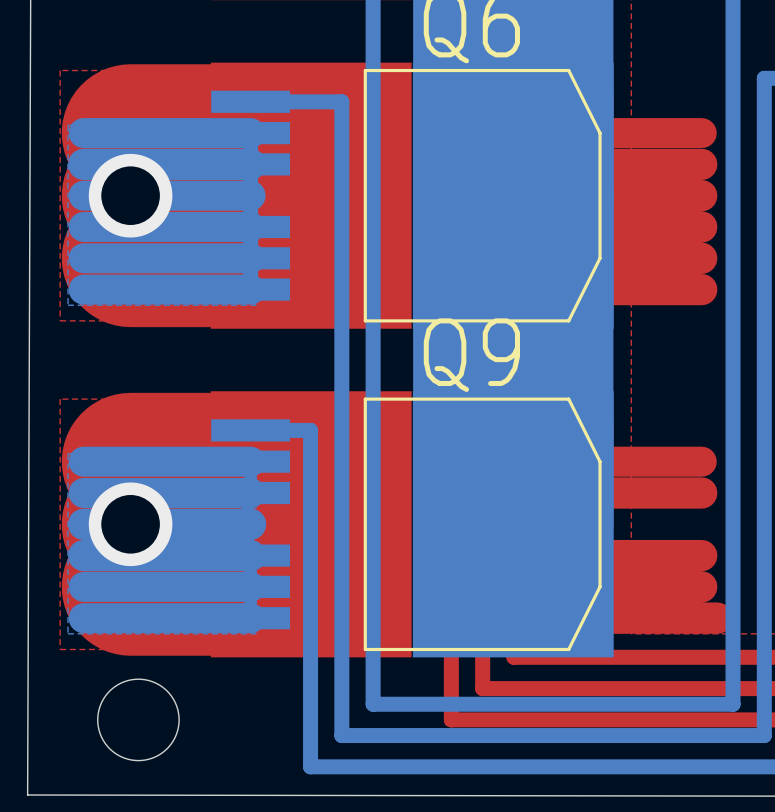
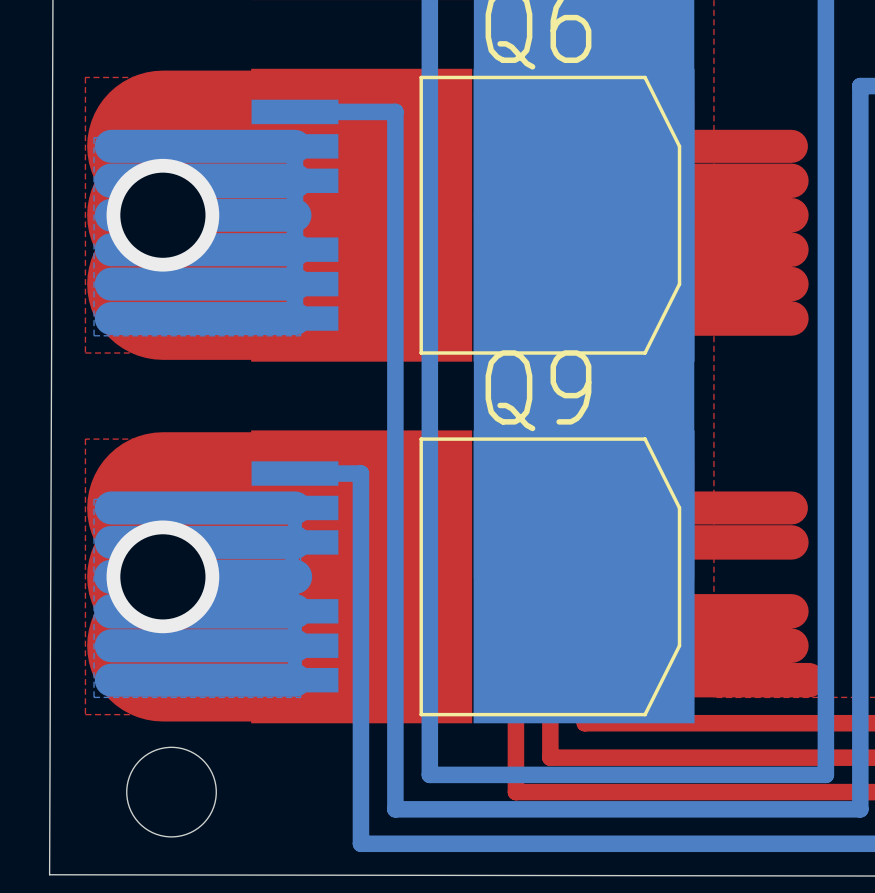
via size: [88, 153, 173, 238] -> [106, 158, 220, 272]
via size: [88, 482, 173, 567] -> [106, 520, 220, 634]

